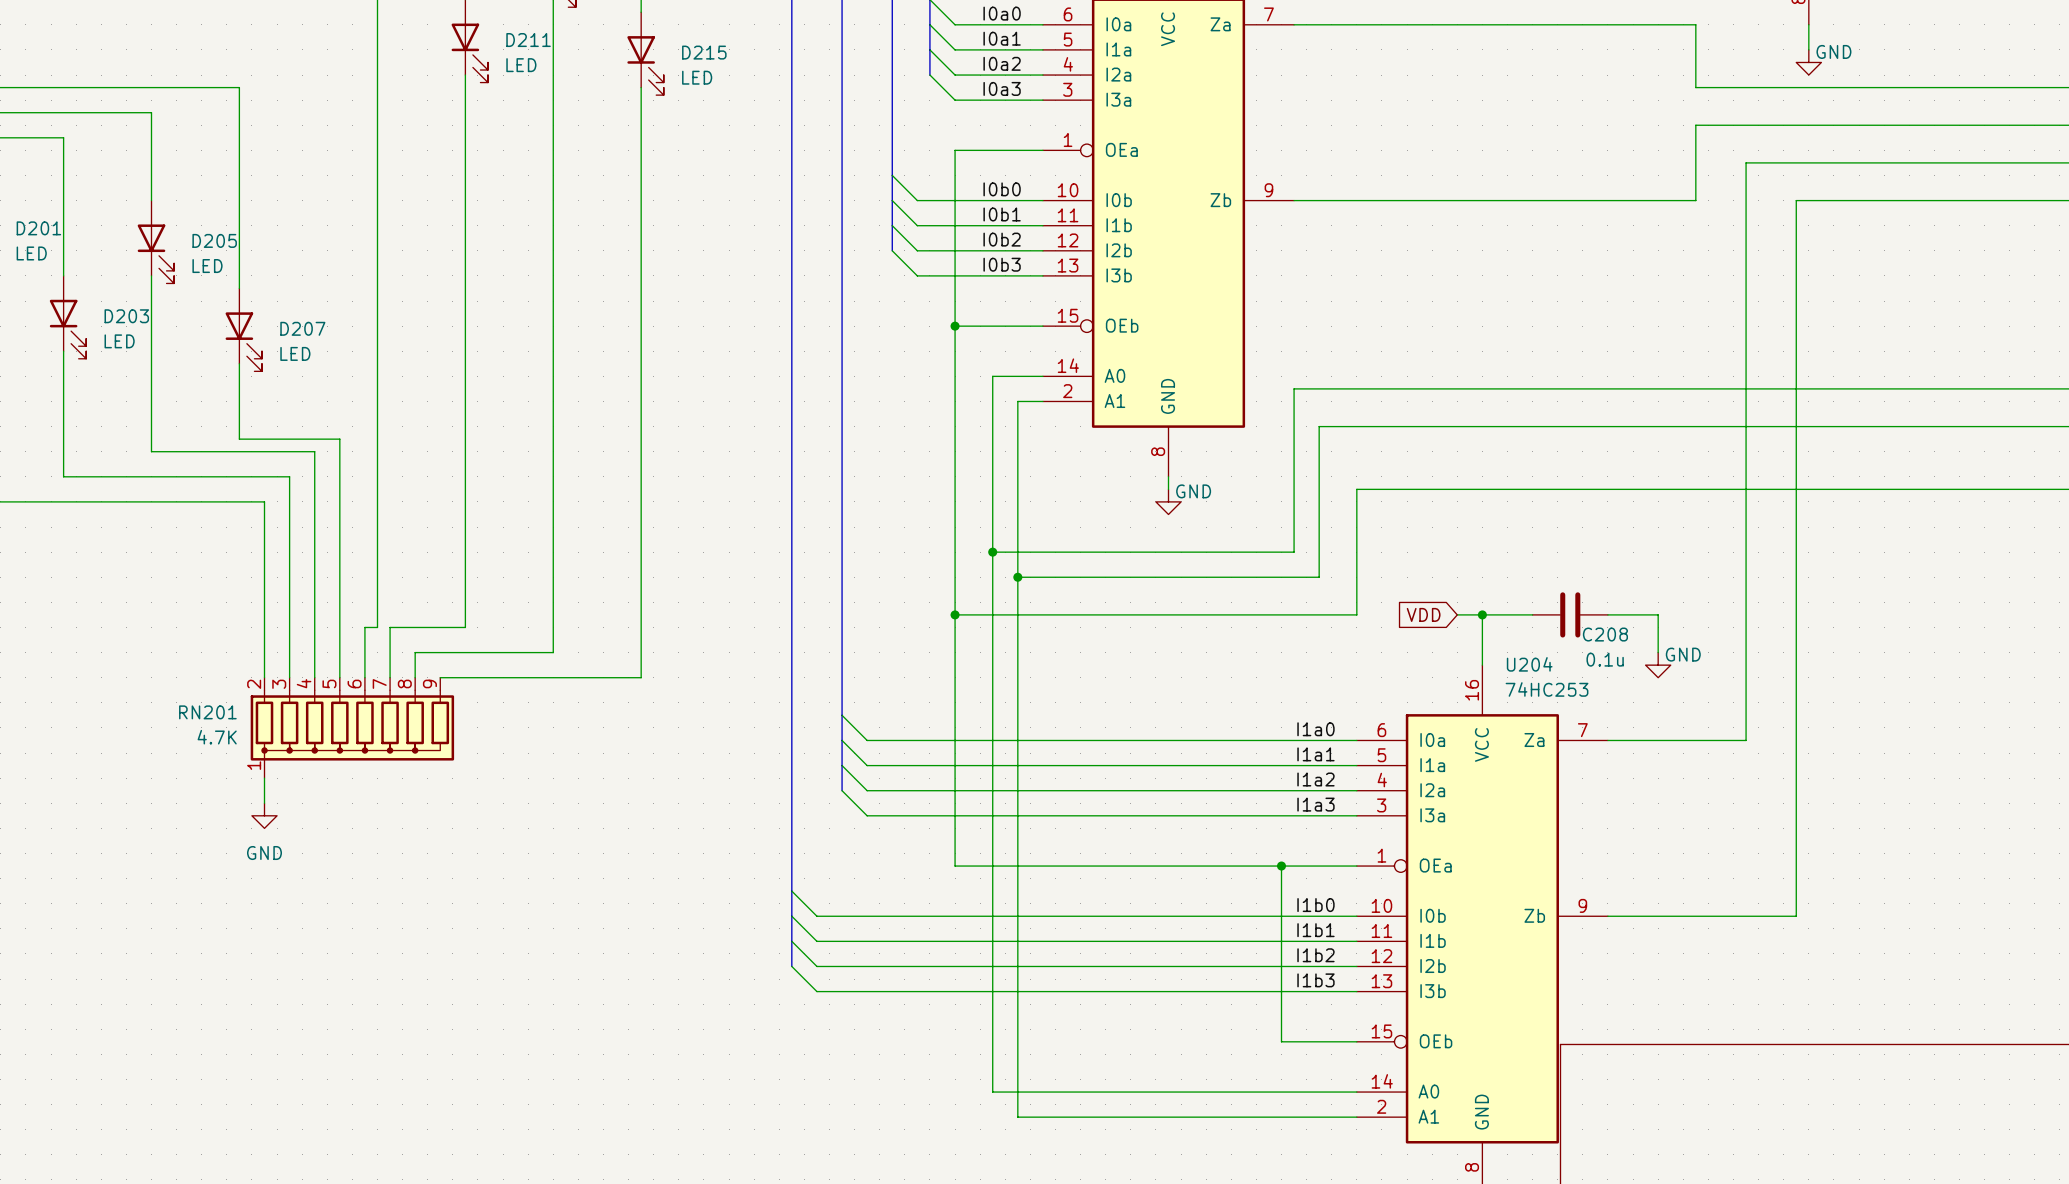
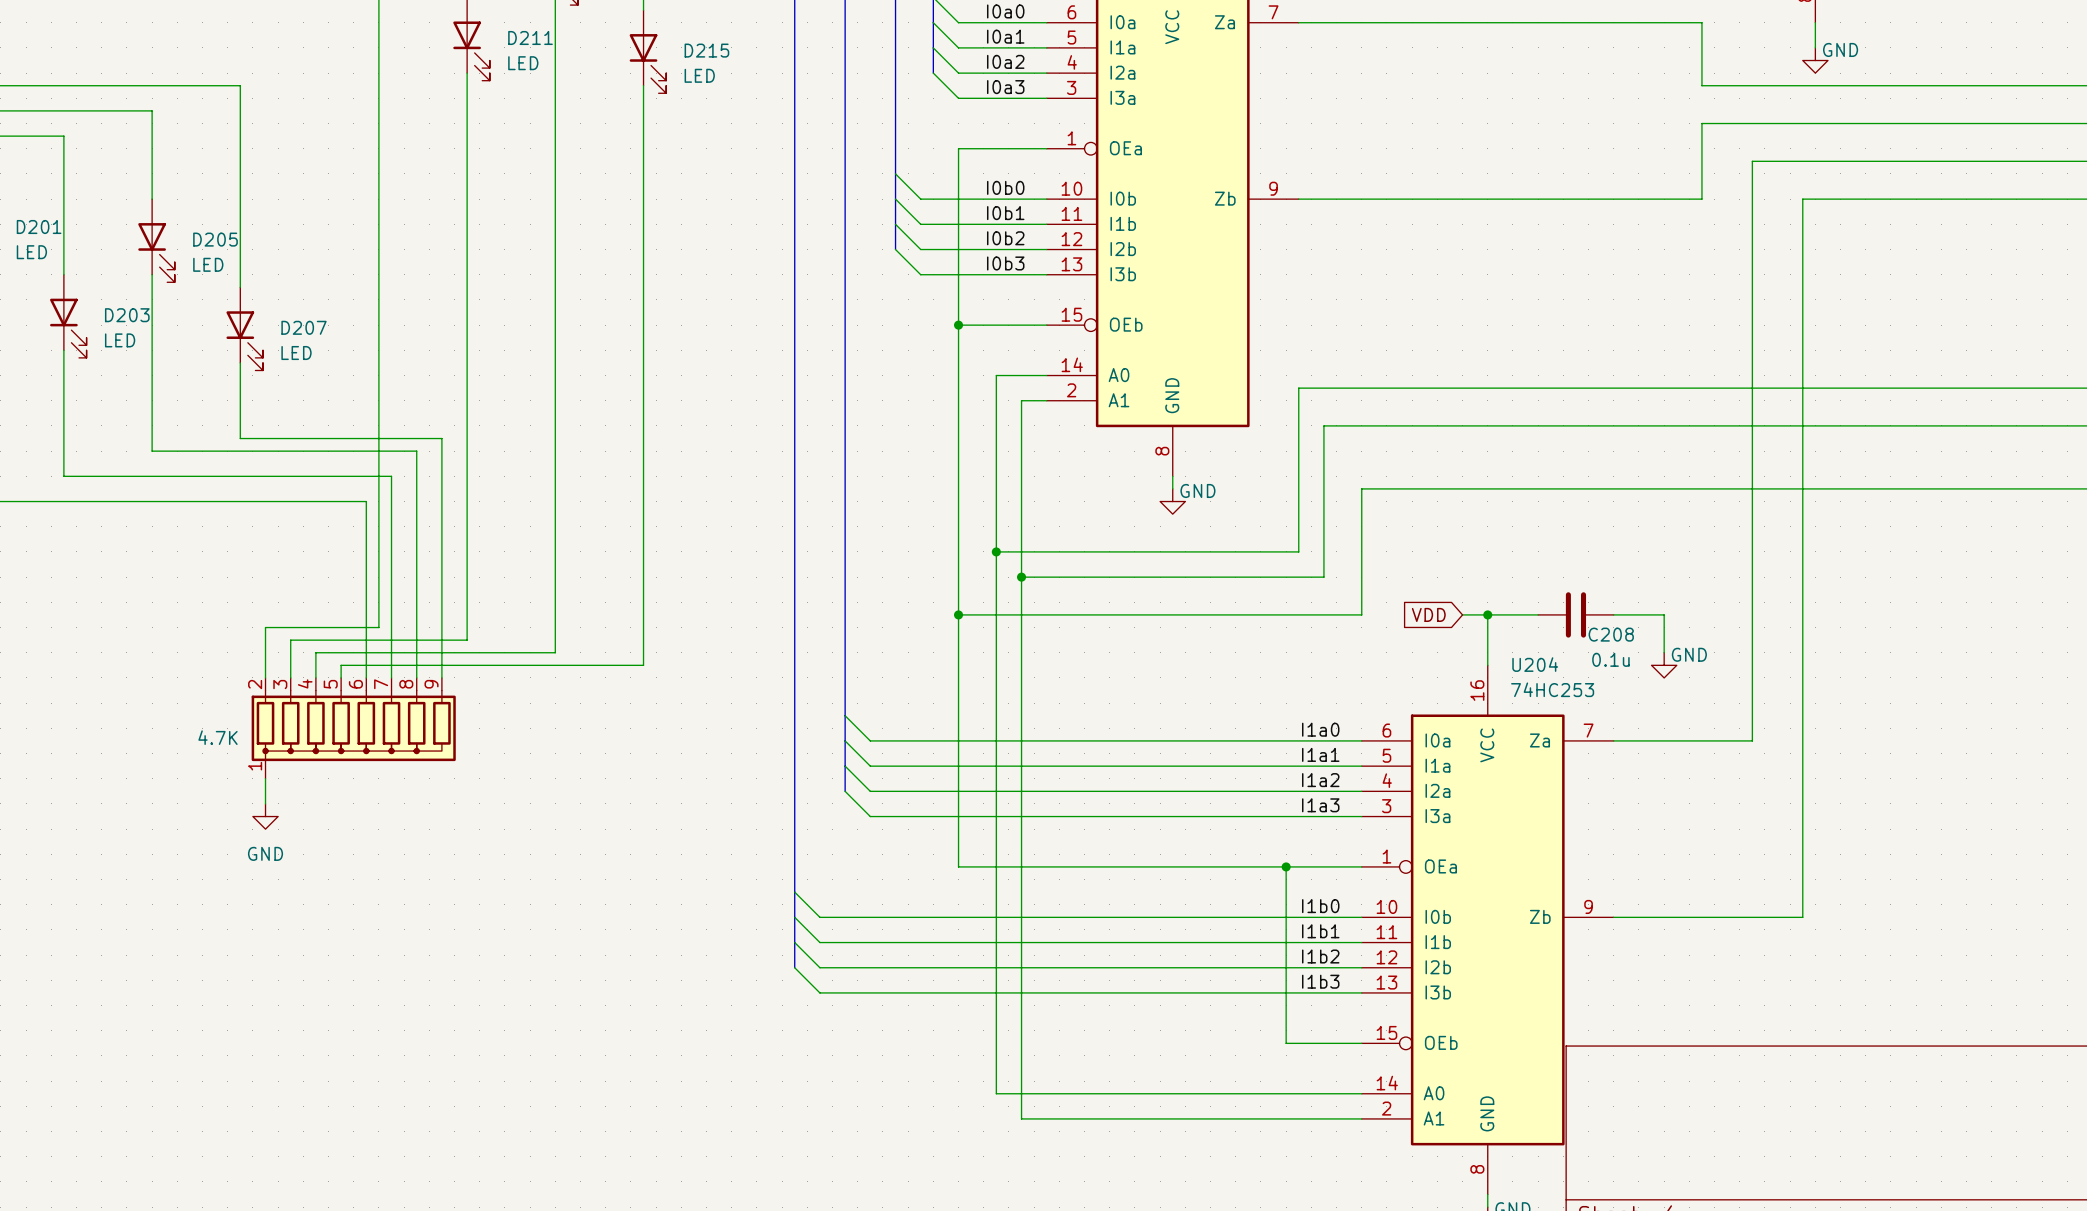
wire: (339, 439) (339, 665) -> (341, 438) (441, 438) (441, 677)
wire: (314, 451) (314, 652) -> (315, 451) (416, 451) (416, 652) (315, 652)
wire: (289, 476) (289, 640) -> (290, 476) (391, 476) (391, 627)
wire: (264, 501) (264, 627) -> (265, 501) (366, 501) (366, 627) (265, 627)
wire: (390, 627) (465, 627) -> (290, 640) (467, 640) (467, 627)
wire: (641, 665) (641, 677) (440, 677) -> (643, 665) (341, 665)
RN201 name: RN201 (207, 712) -> none

